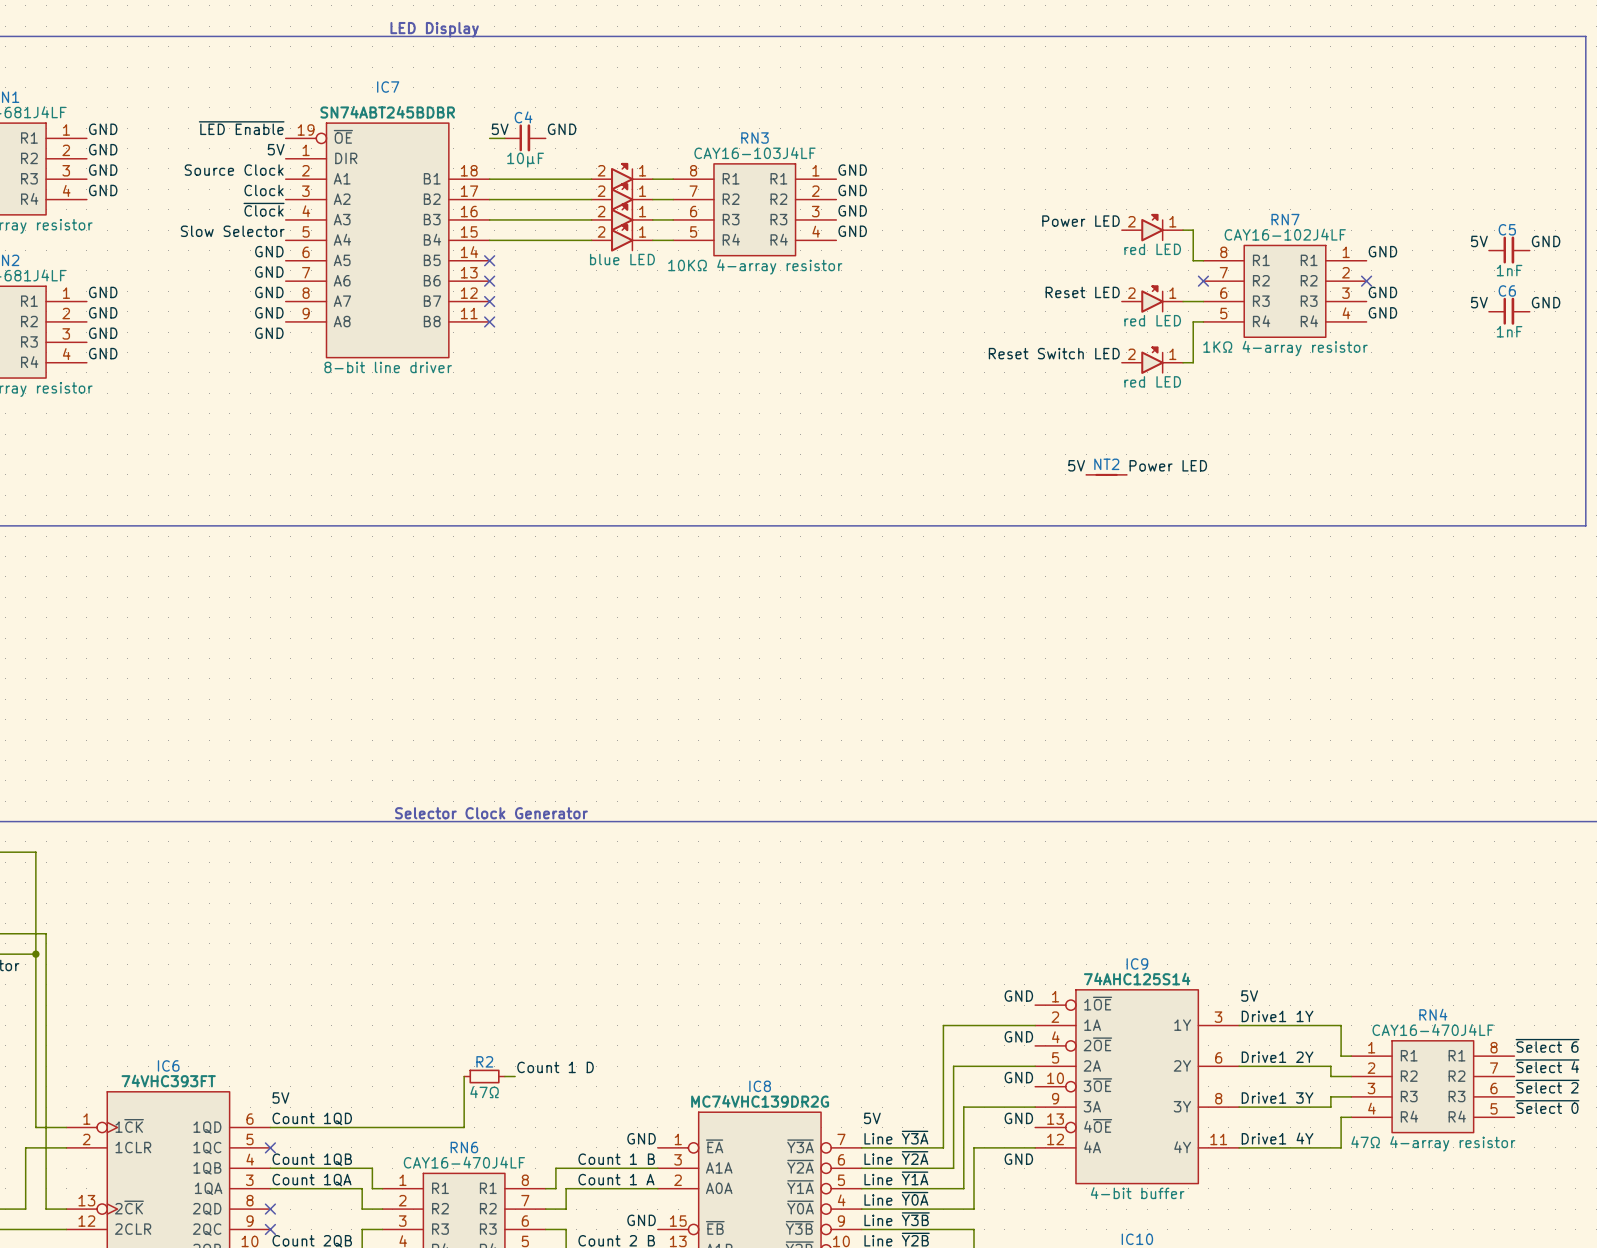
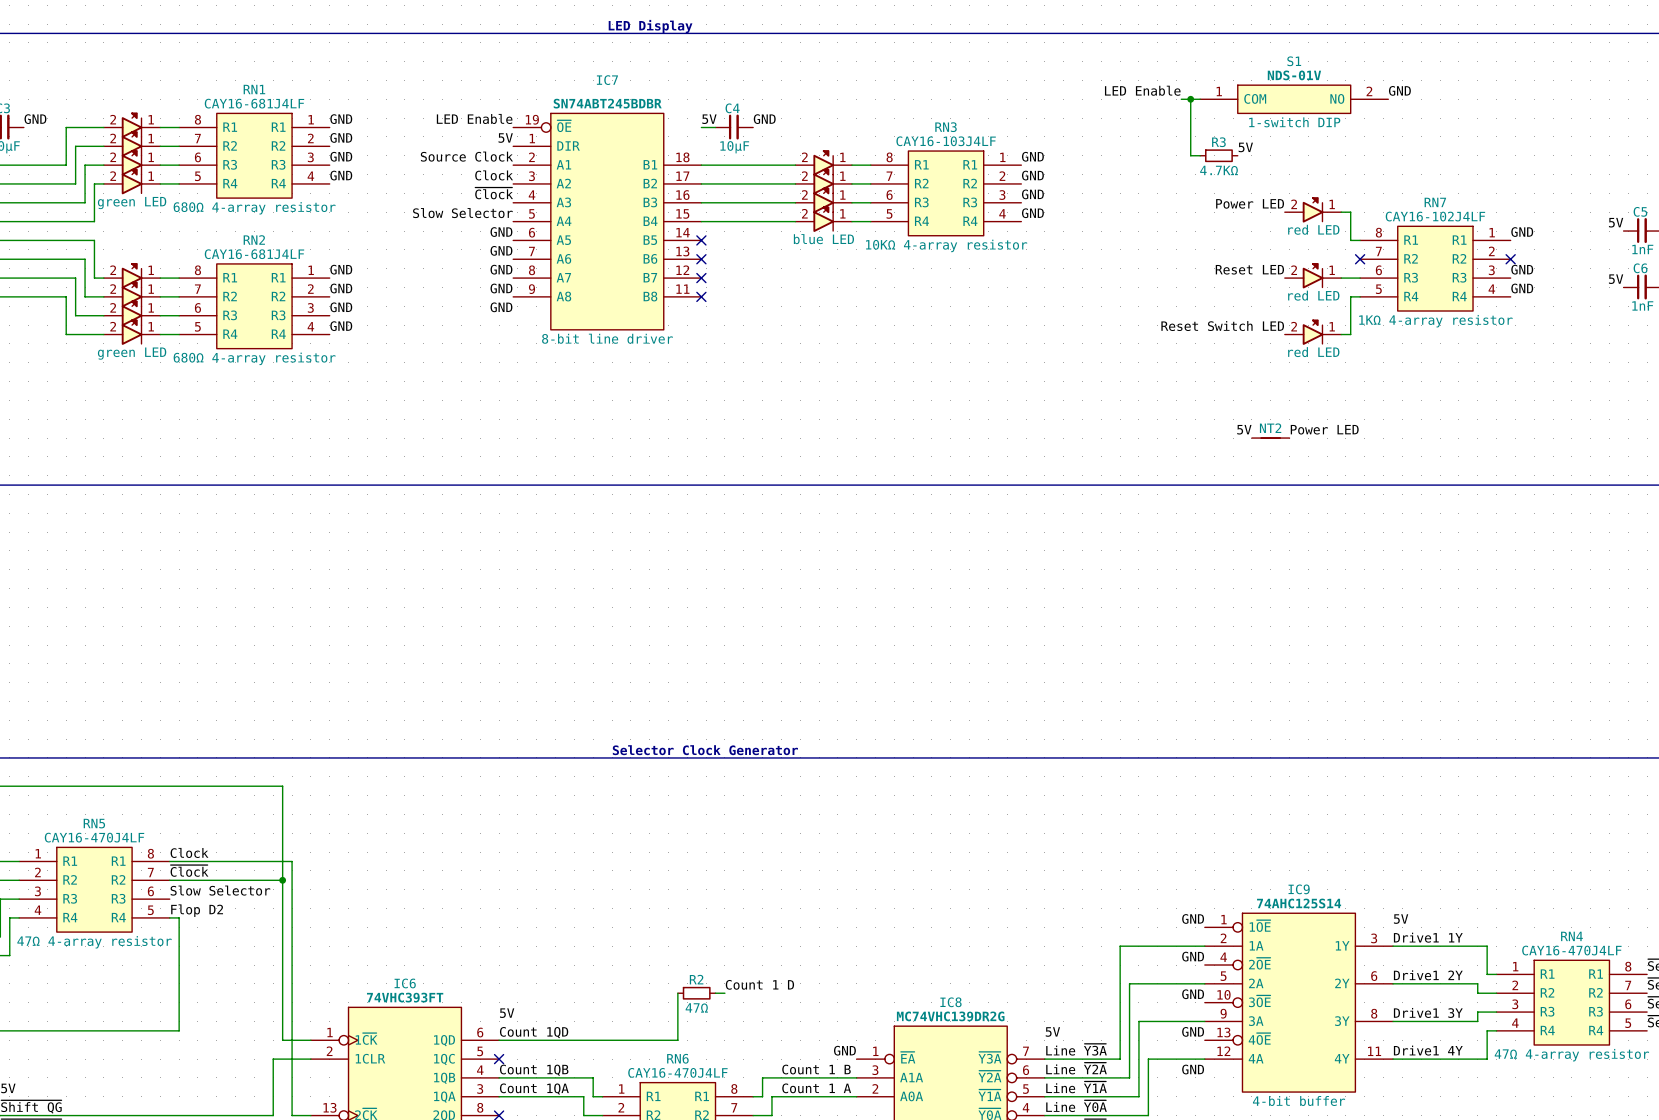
label: none -> LED Enable (1142, 90)
label: none -> GND (1399, 90)
wire: none -> (1181, 99) (1200, 99)
wire: none -> (1190, 99) (1190, 155) (1200, 155)
junction: none -> (1190, 99)
S1: none -> NDS-01V (1294, 99)
label: ~{LED Enable} (241, 128) -> LED Enable (474, 118)
label: none -> 5V (1245, 147)
R3: none -> (1218, 155)

